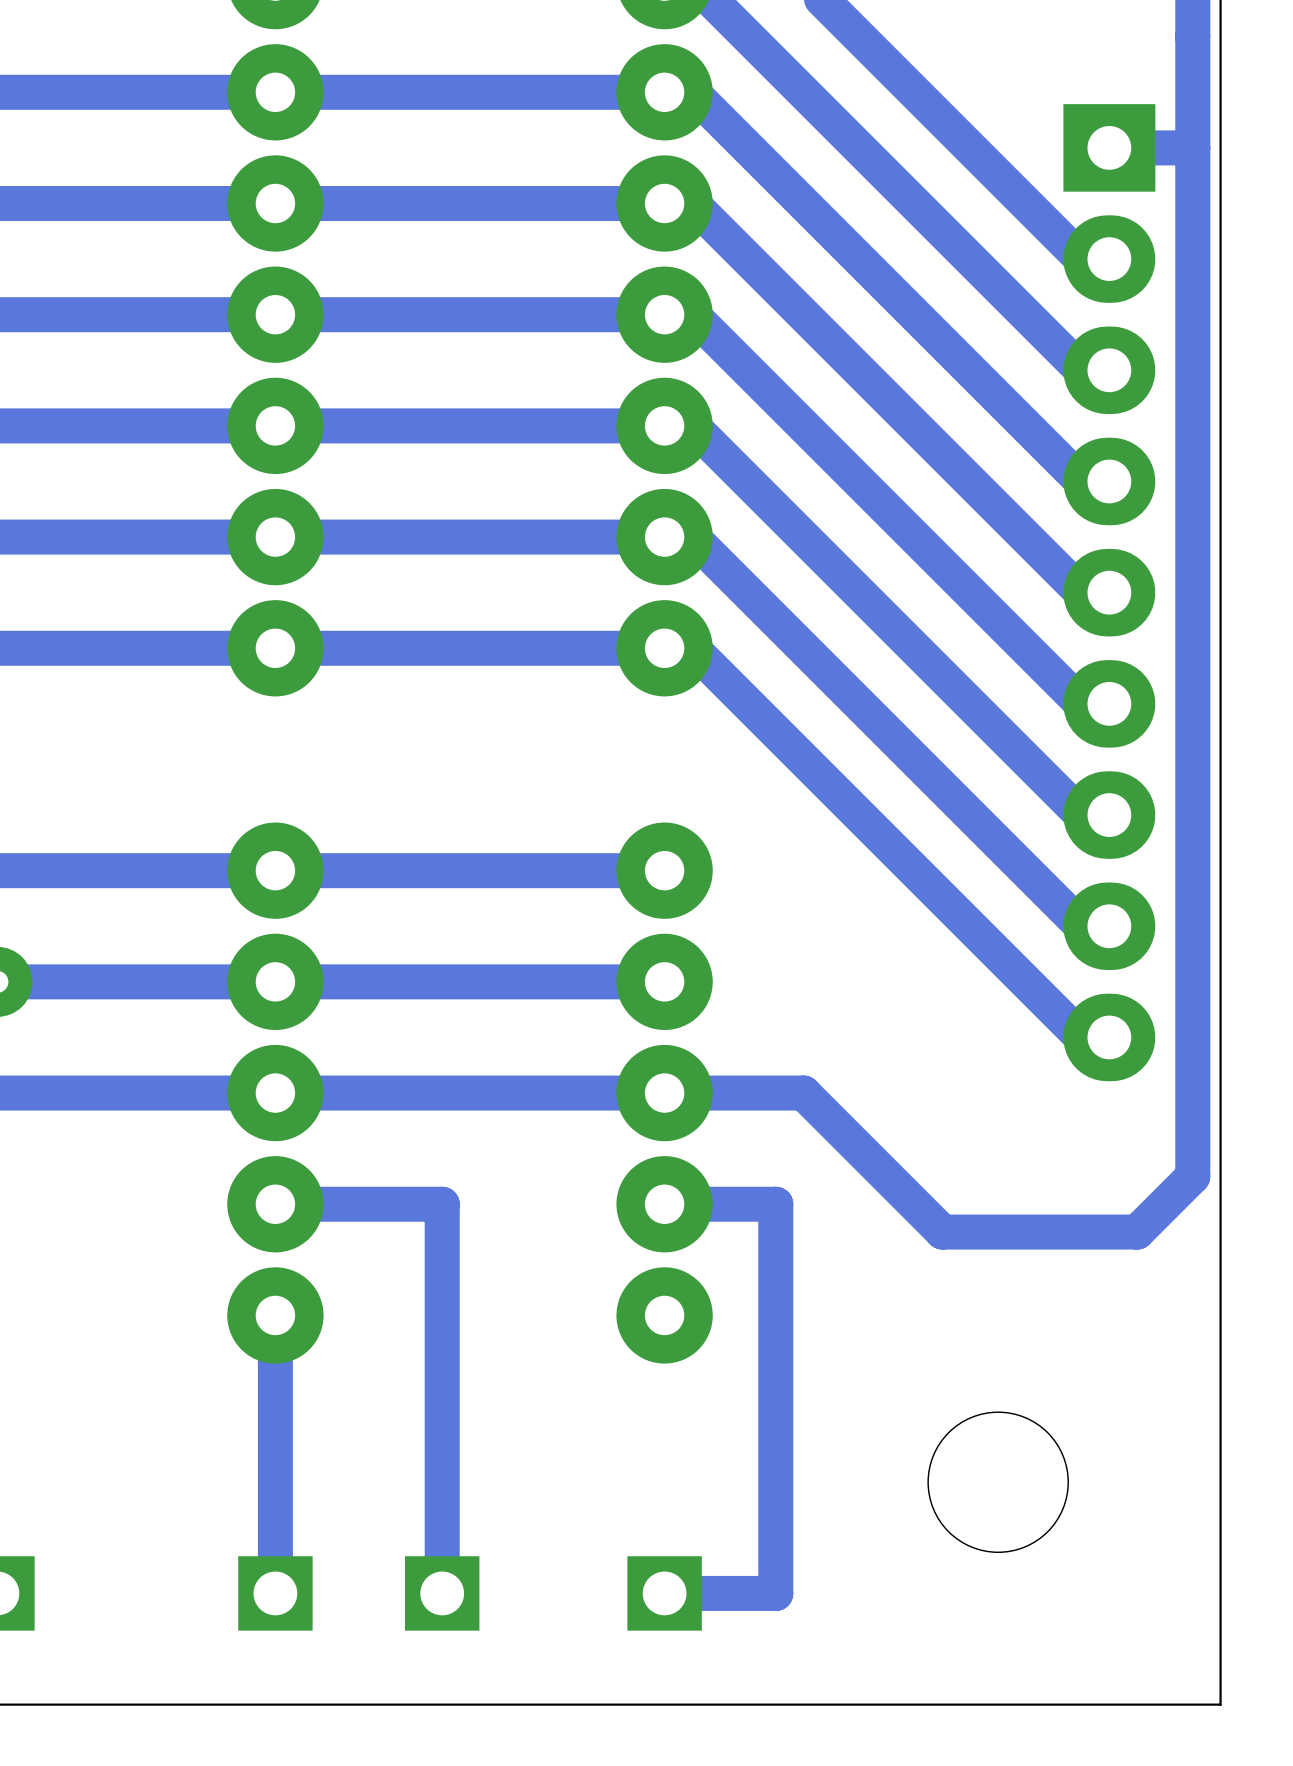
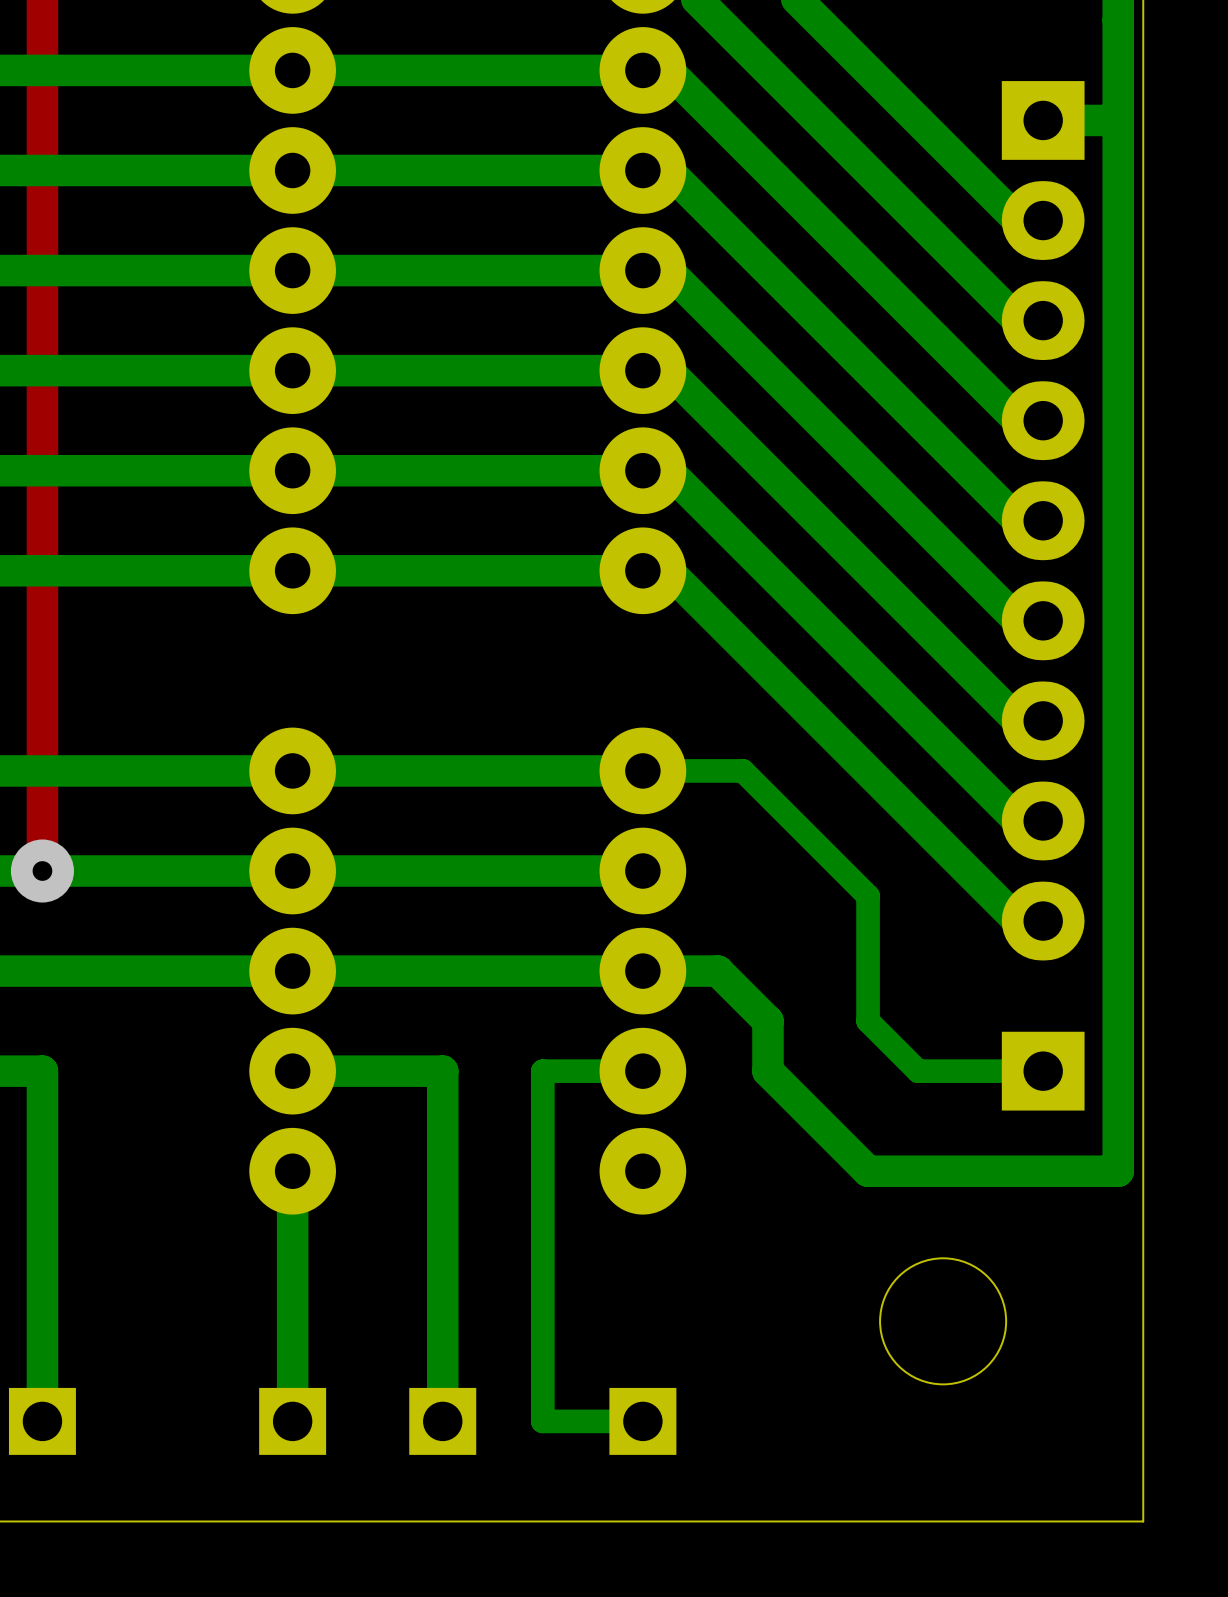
bottom track: none -> (642, 770) (742, 770) (868, 896) (868, 1021) (918, 1071) (1043, 1071)
bottom track: (747, 1093) (803, 1093) (942, 1232) (1137, 1232) (1192, 1176) -> (717, 971) (767, 1021) (767, 1071) (868, 1171) (1118, 1171) (1118, 1046)
bottom track: (664, 1204) (775, 1204) (775, 1593) (664, 1593) -> (642, 1071) (542, 1071) (542, 1421) (642, 1421)
part: none -> (1043, 1071)

